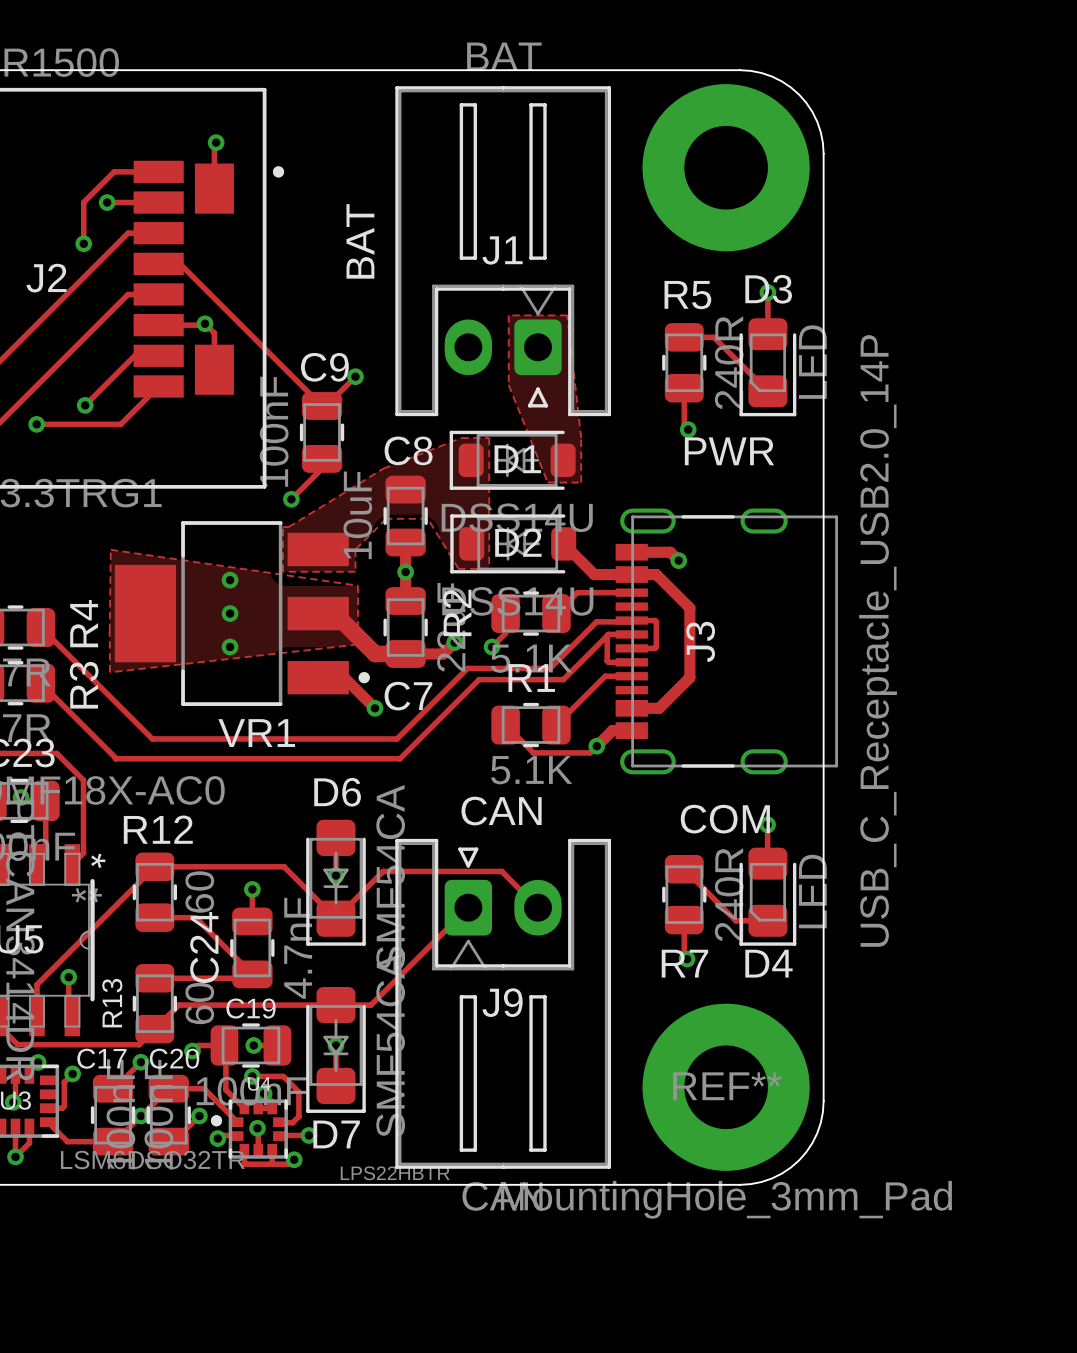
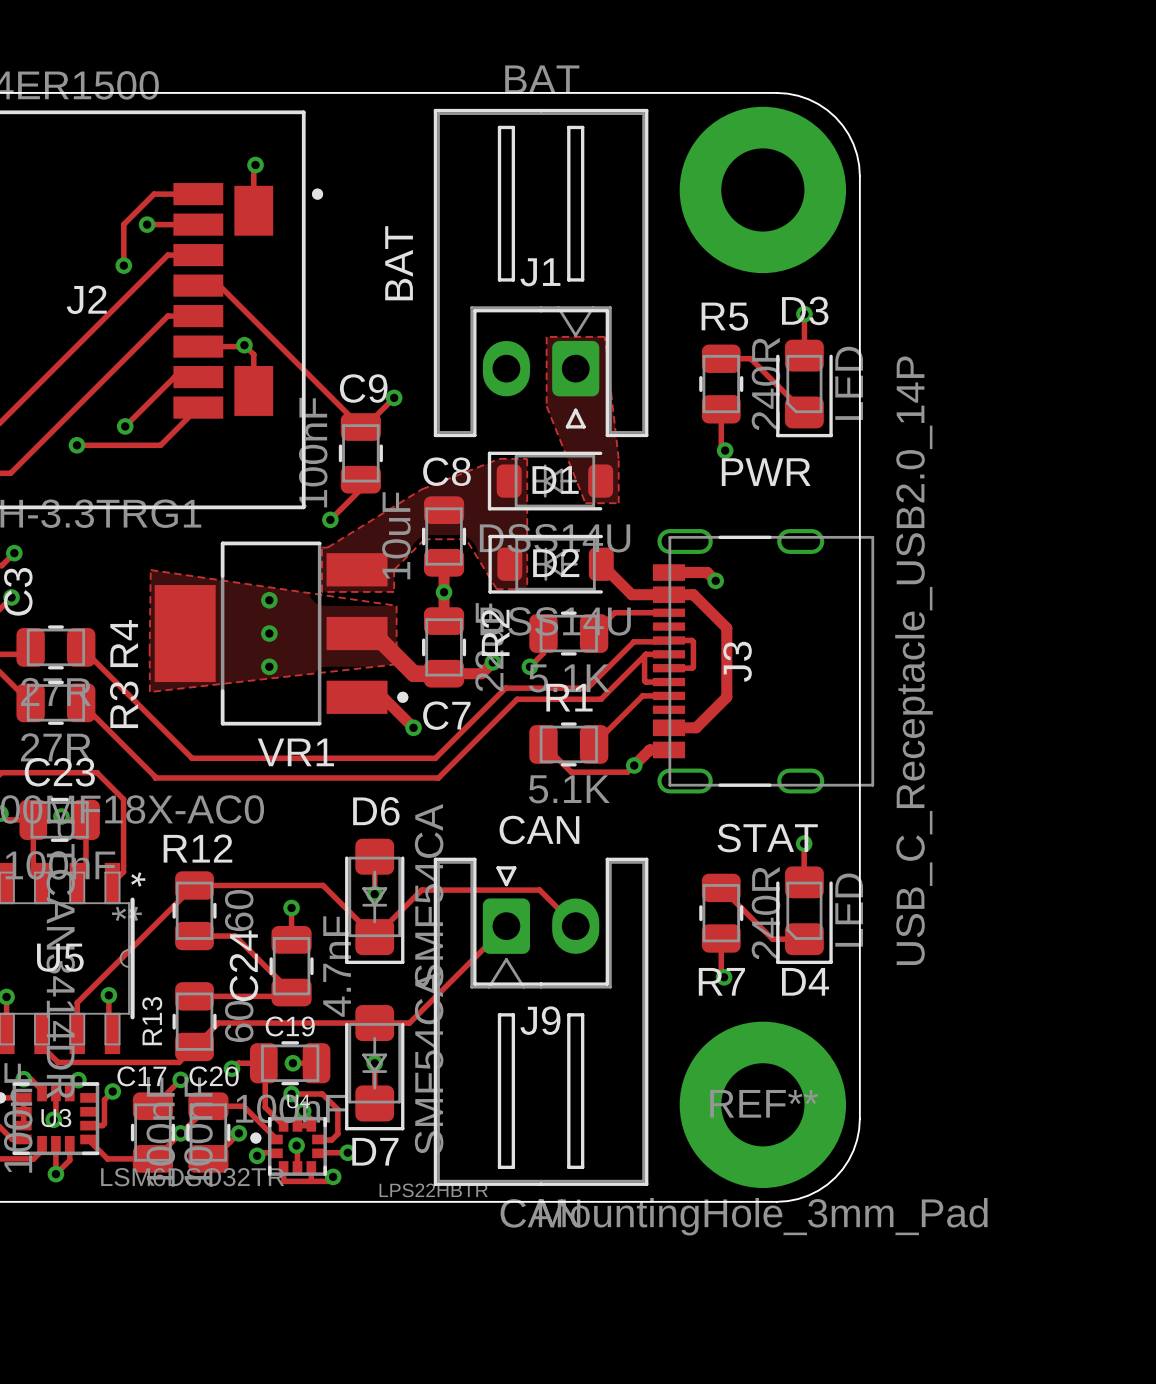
text: COM (725, 819) -> STAT (767, 838)

